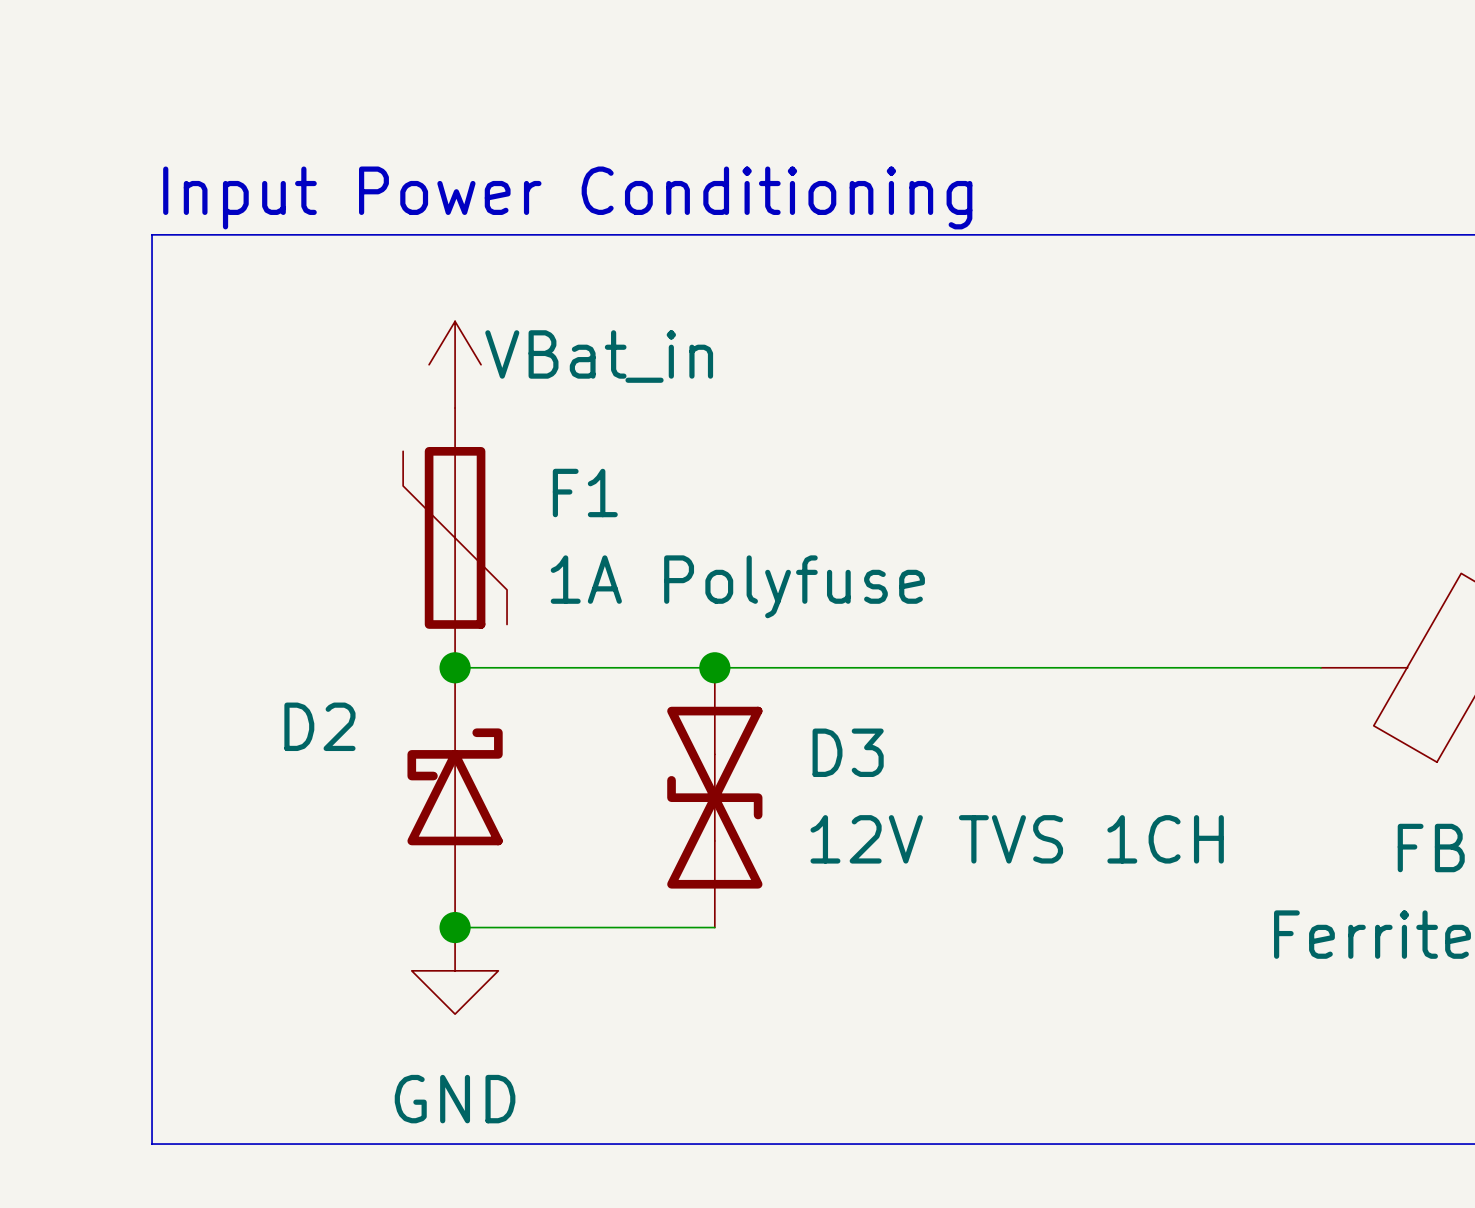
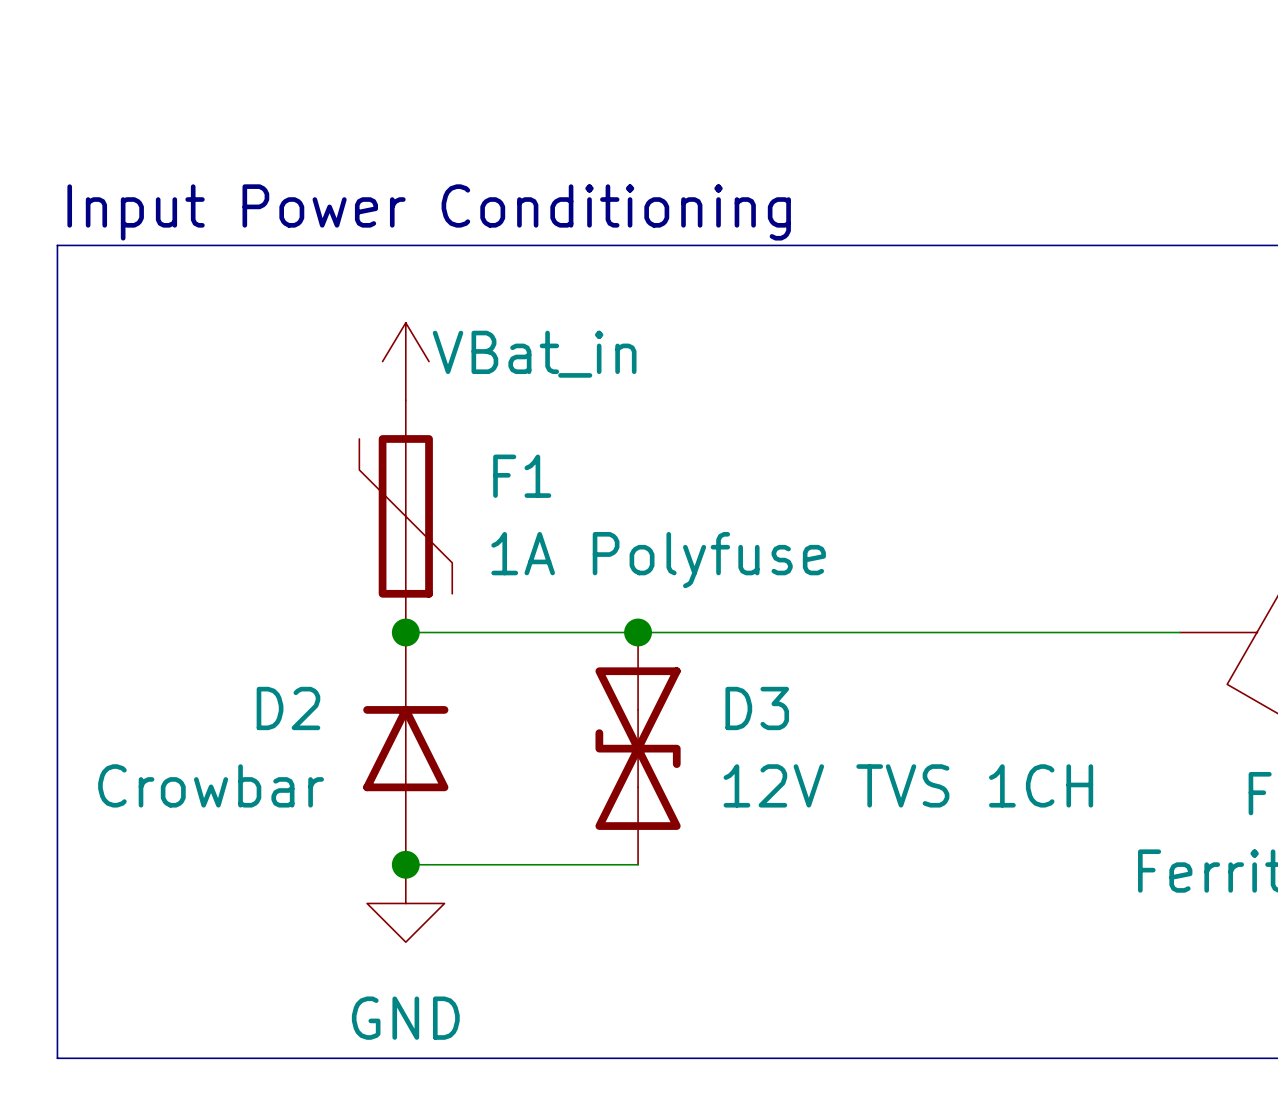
text position: Input Power Conditioning (567, 197) -> Input Power Conditioning (429, 212)
line: (152, 234) (152, 1144) -> (134, 245) (57, 245) (57, 1058) (134, 1058)
D2 symbol: [407, 667, 503, 928] -> [363, 632, 449, 865]
D2 name position: D2 (319, 726) -> D2 (288, 708)
D2 value: none -> Crowbar (211, 785)

